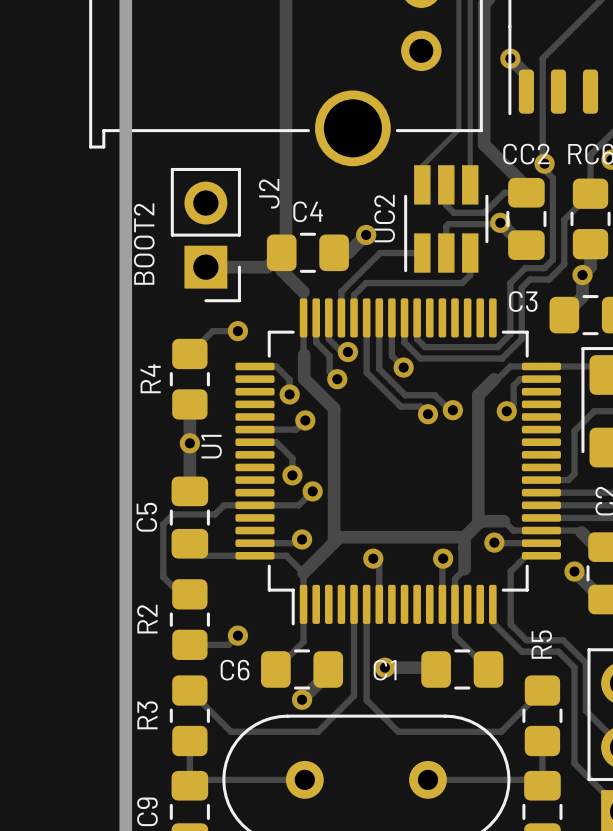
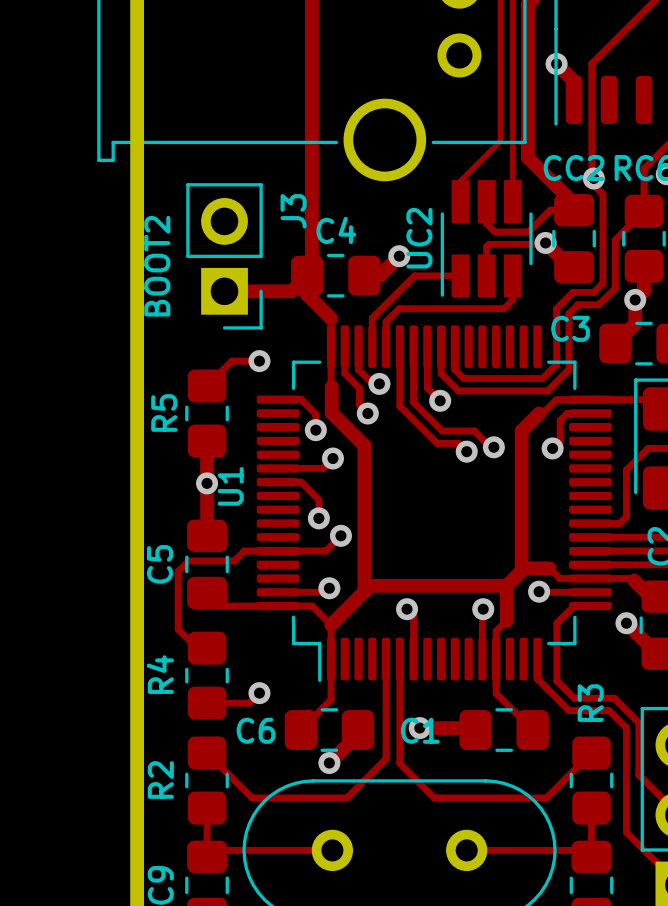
J2 name: J2 (269, 193) -> J3 (293, 211)
R4 name: R4 (150, 378) -> R5 (164, 412)
R2 name: R2 (147, 619) -> R4 (160, 674)
R5 name: R5 (541, 644) -> R3 (590, 703)
R3 name: R3 (147, 715) -> R2 (160, 779)

